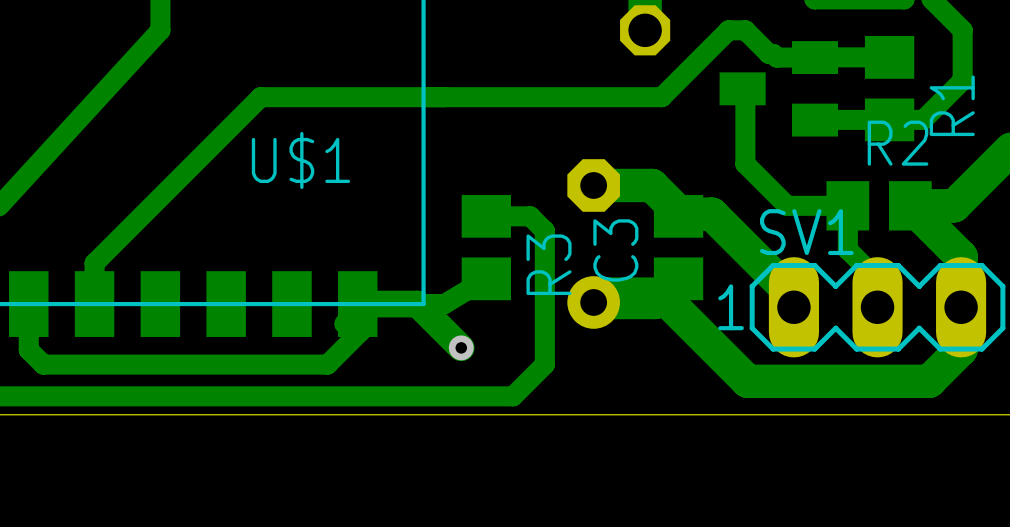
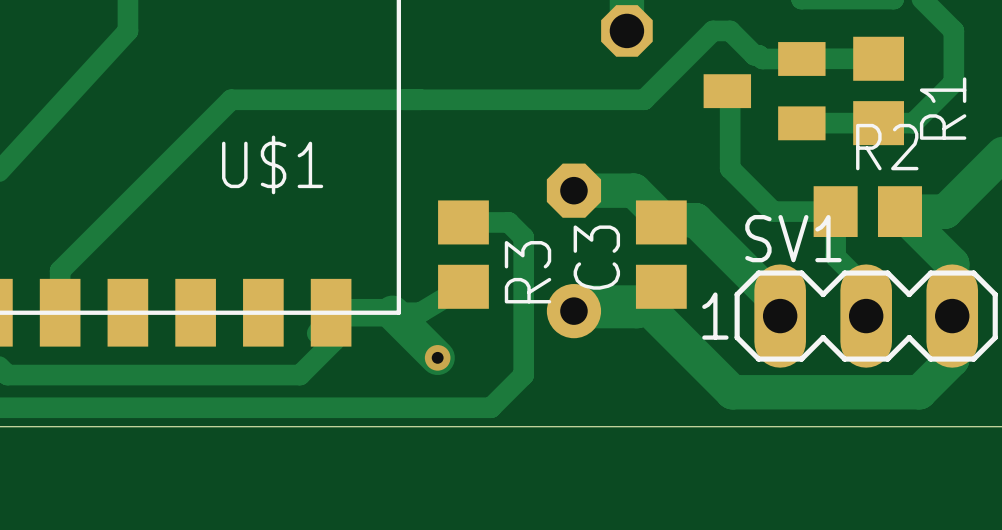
track width: thin (417, 304) (461, 347) -> thick (392, 312) (437, 357)

